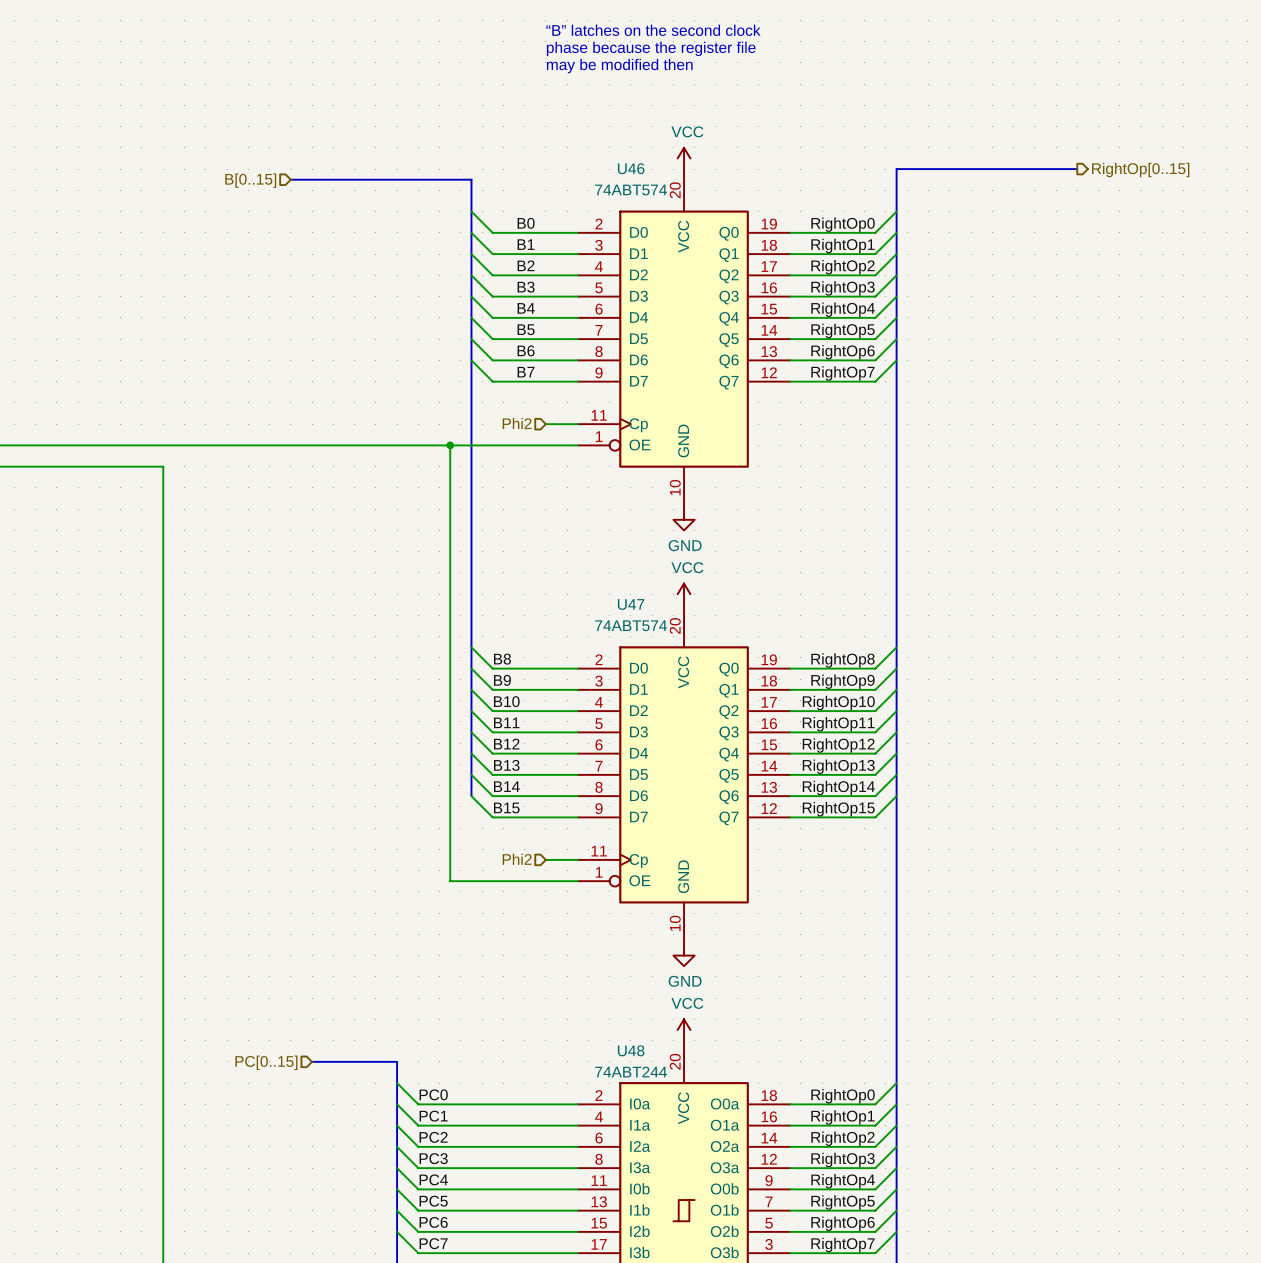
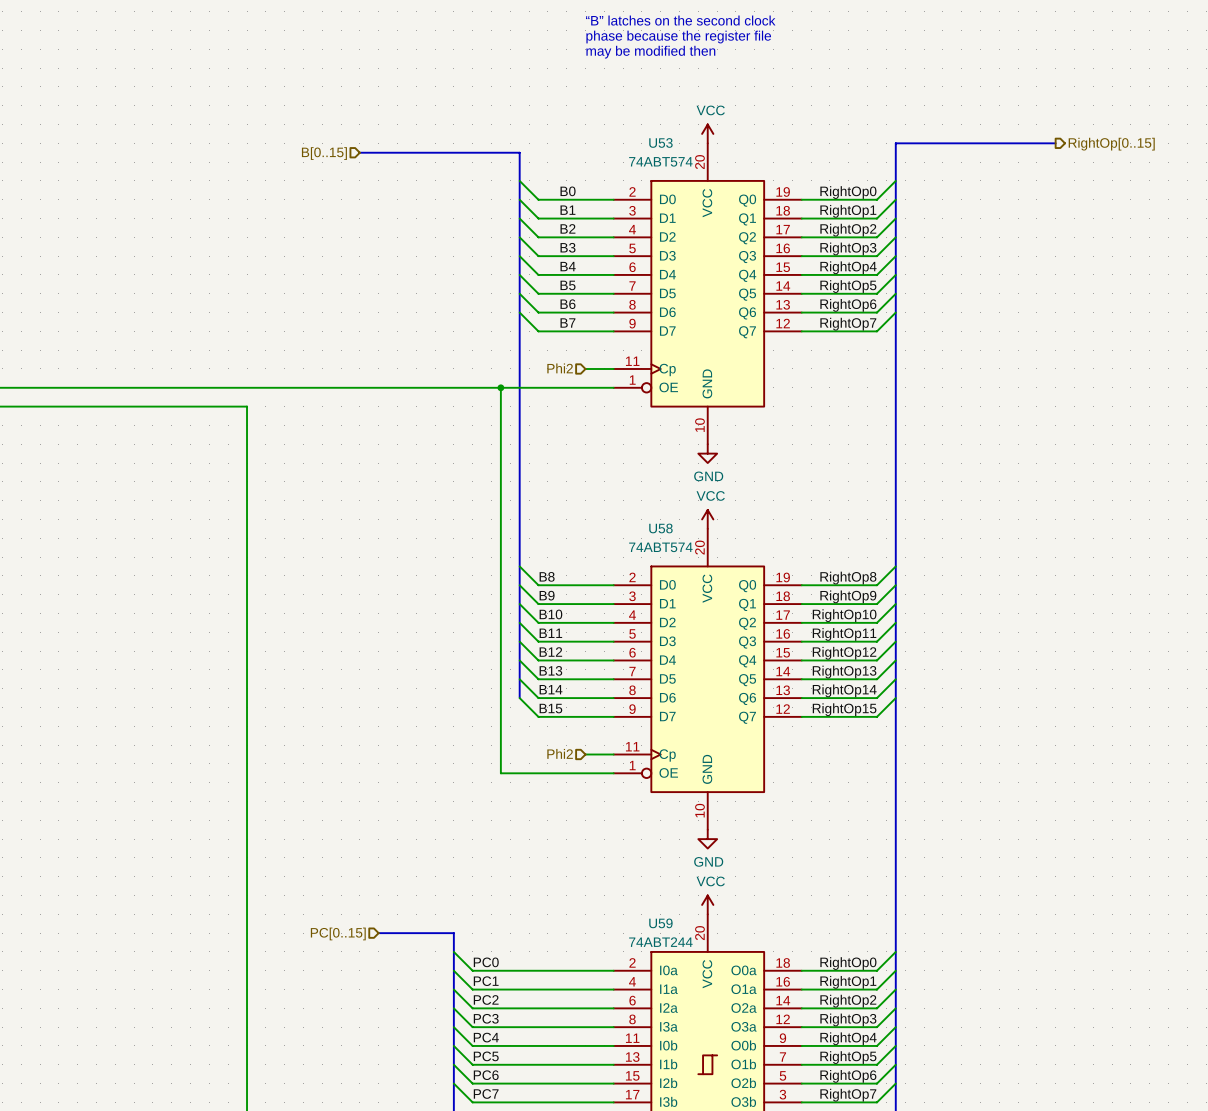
U46 name: U46 (631, 168) -> U53 (660, 142)
U47 name: U47 (631, 604) -> U58 (660, 528)
U48 name: U48 (631, 1050) -> U59 (660, 923)

